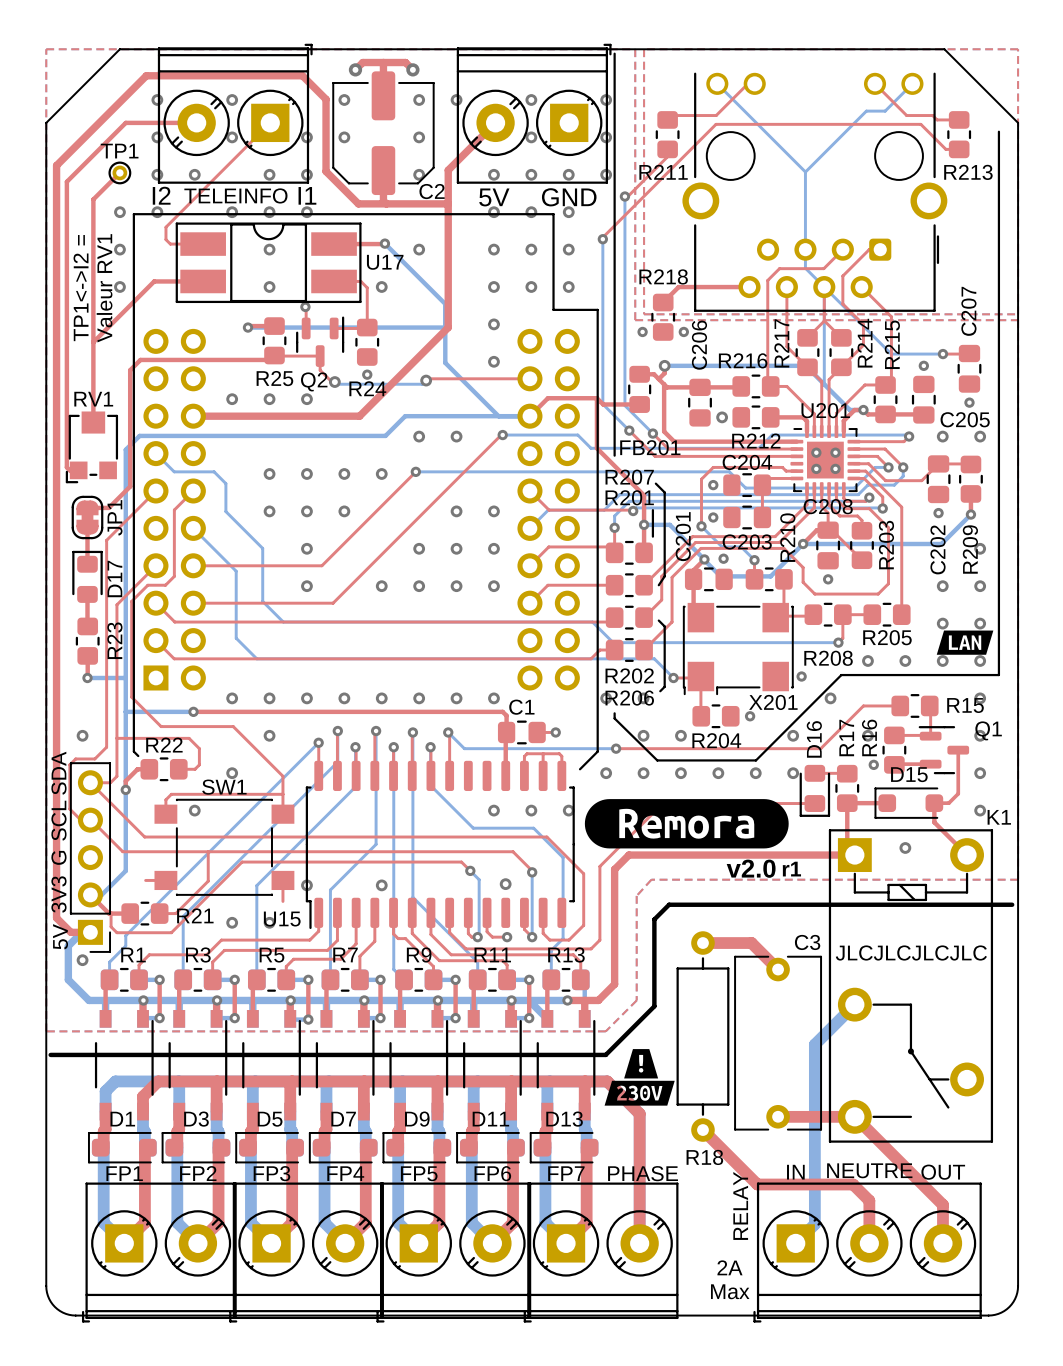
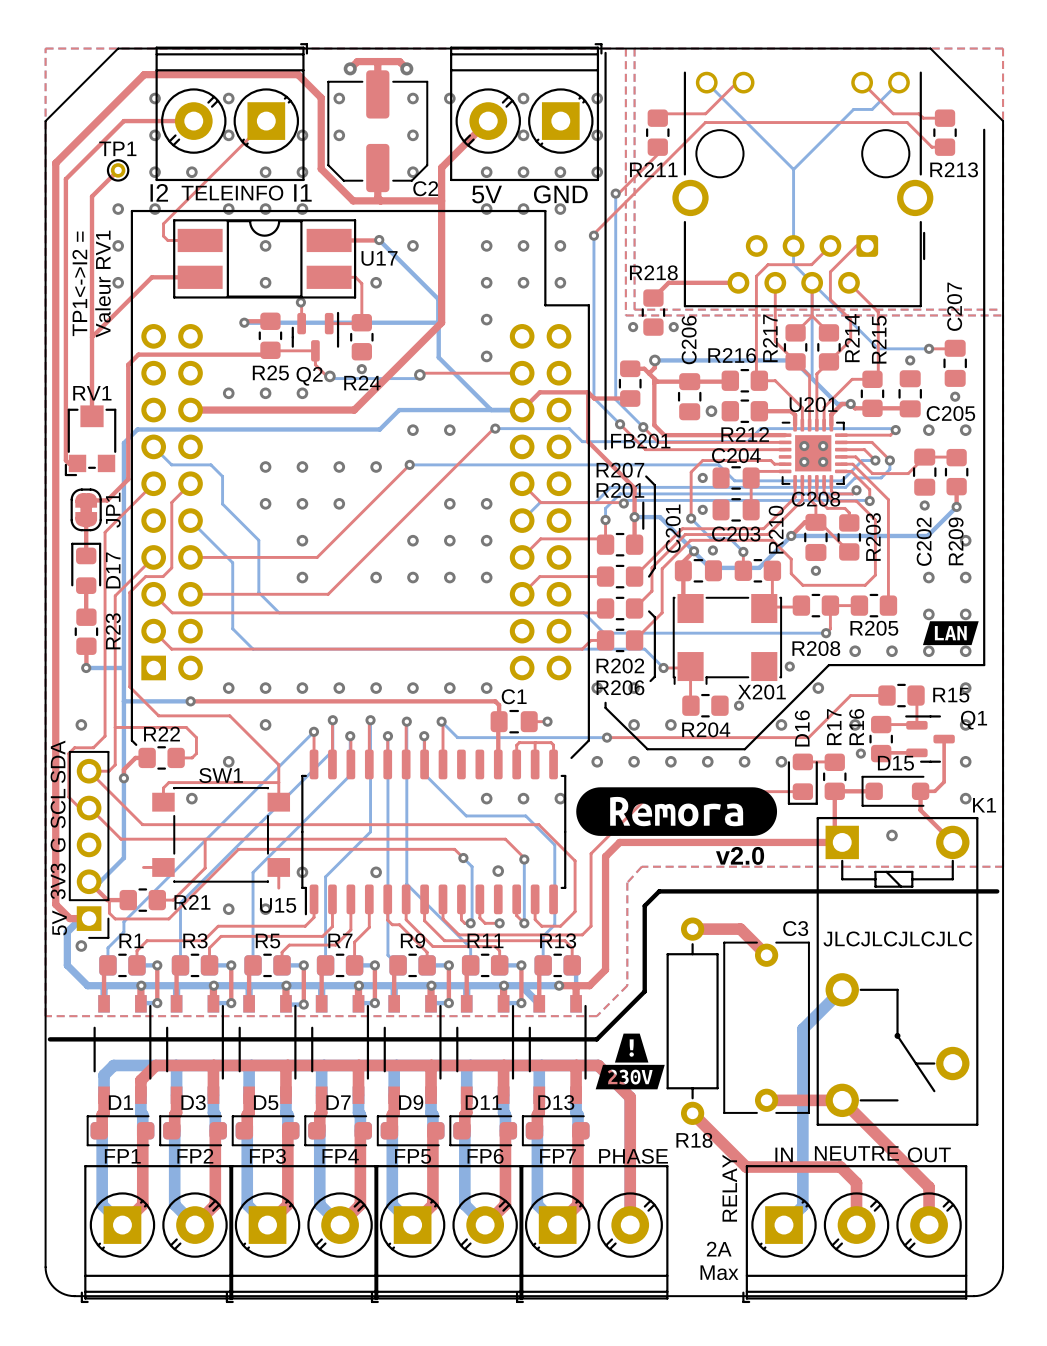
text: r1 (791, 869) -> none

